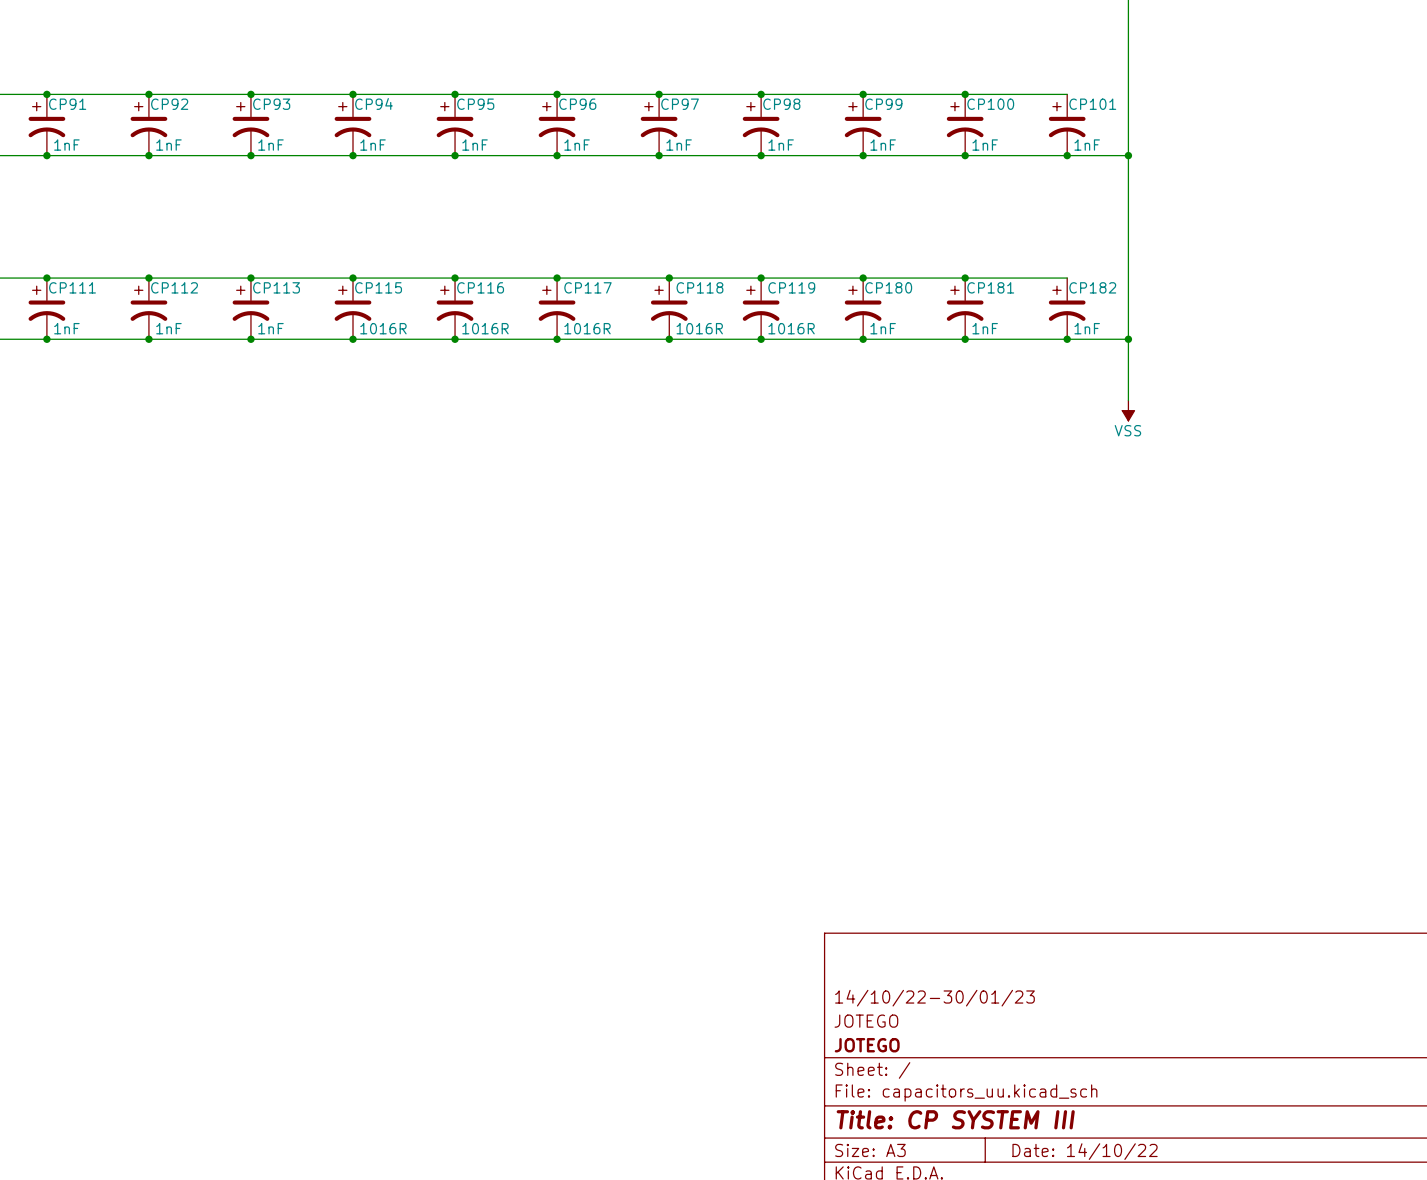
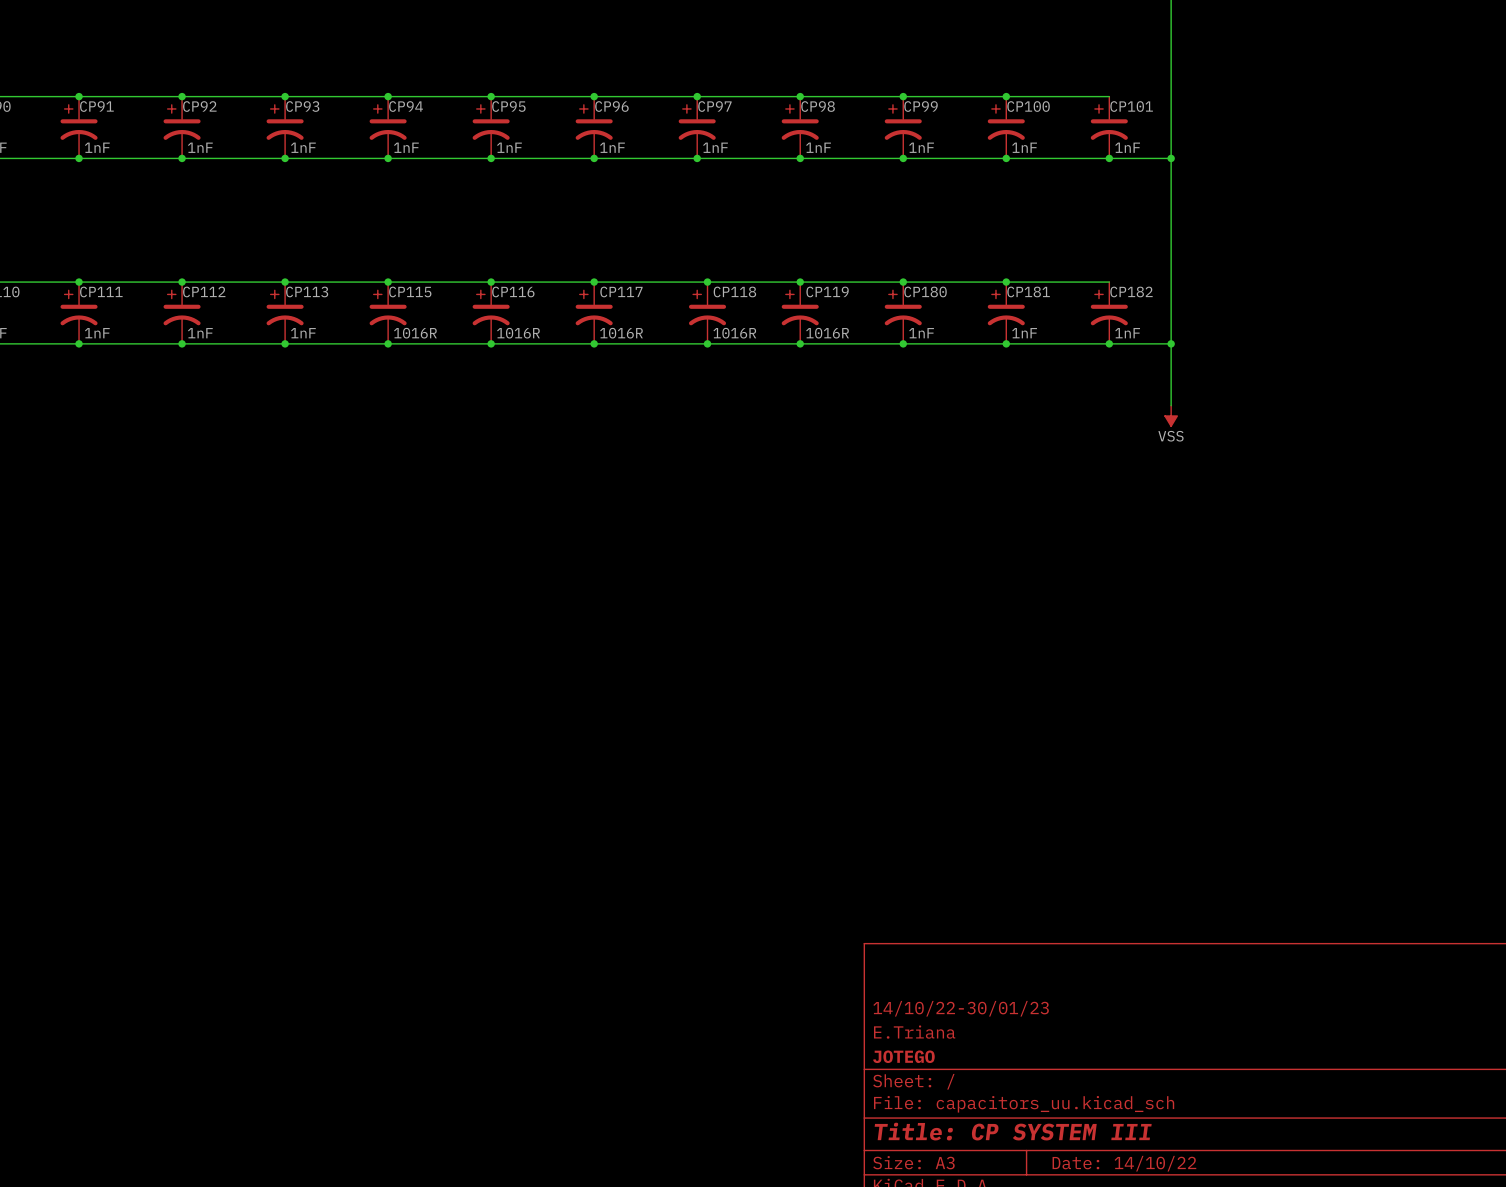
title block: JOTEGO (866, 1021) -> E.Triana (914, 1032)

